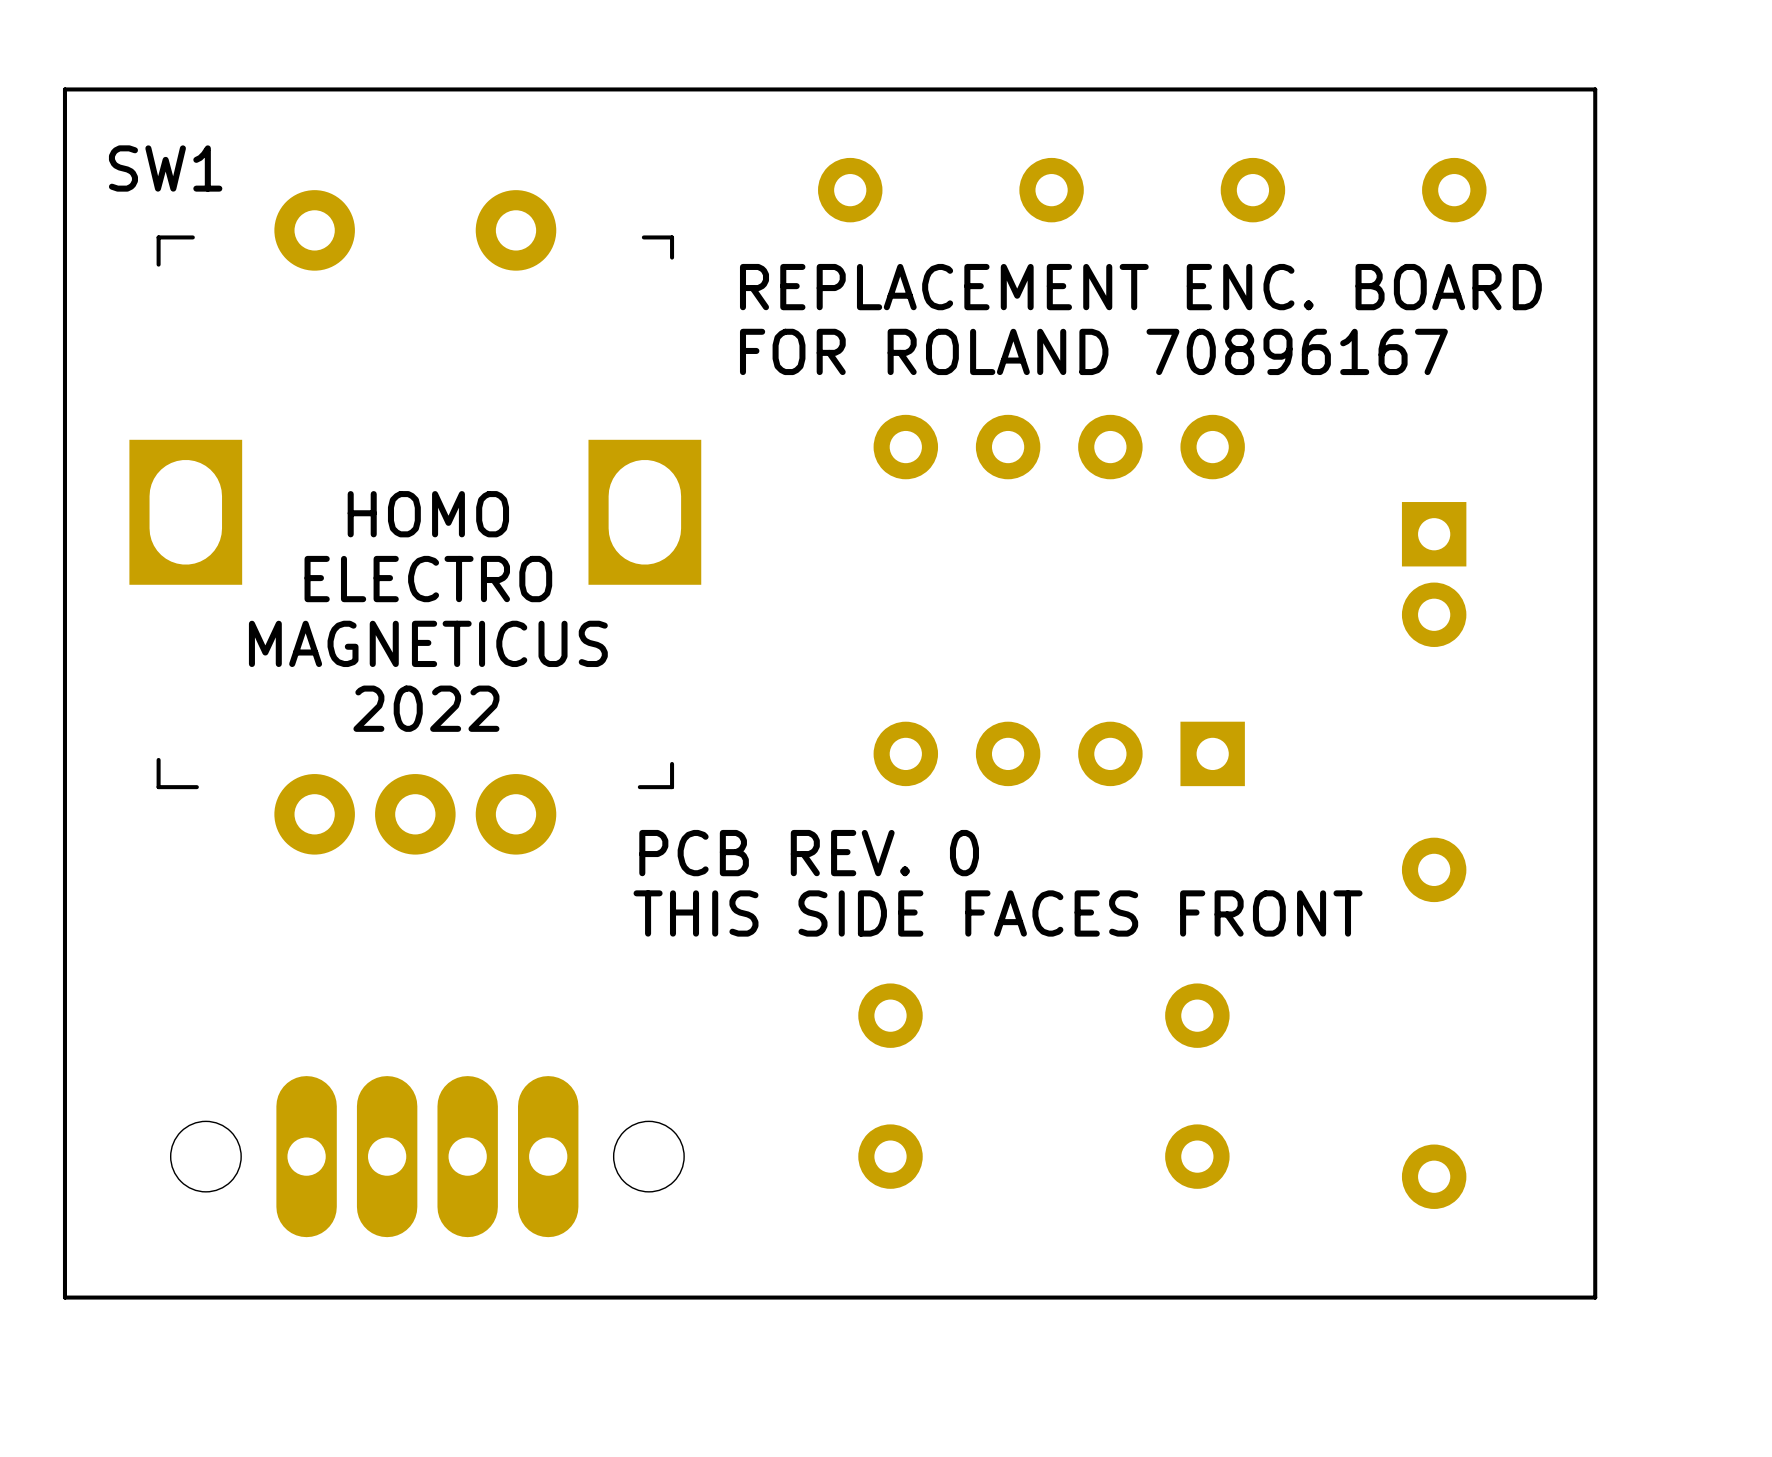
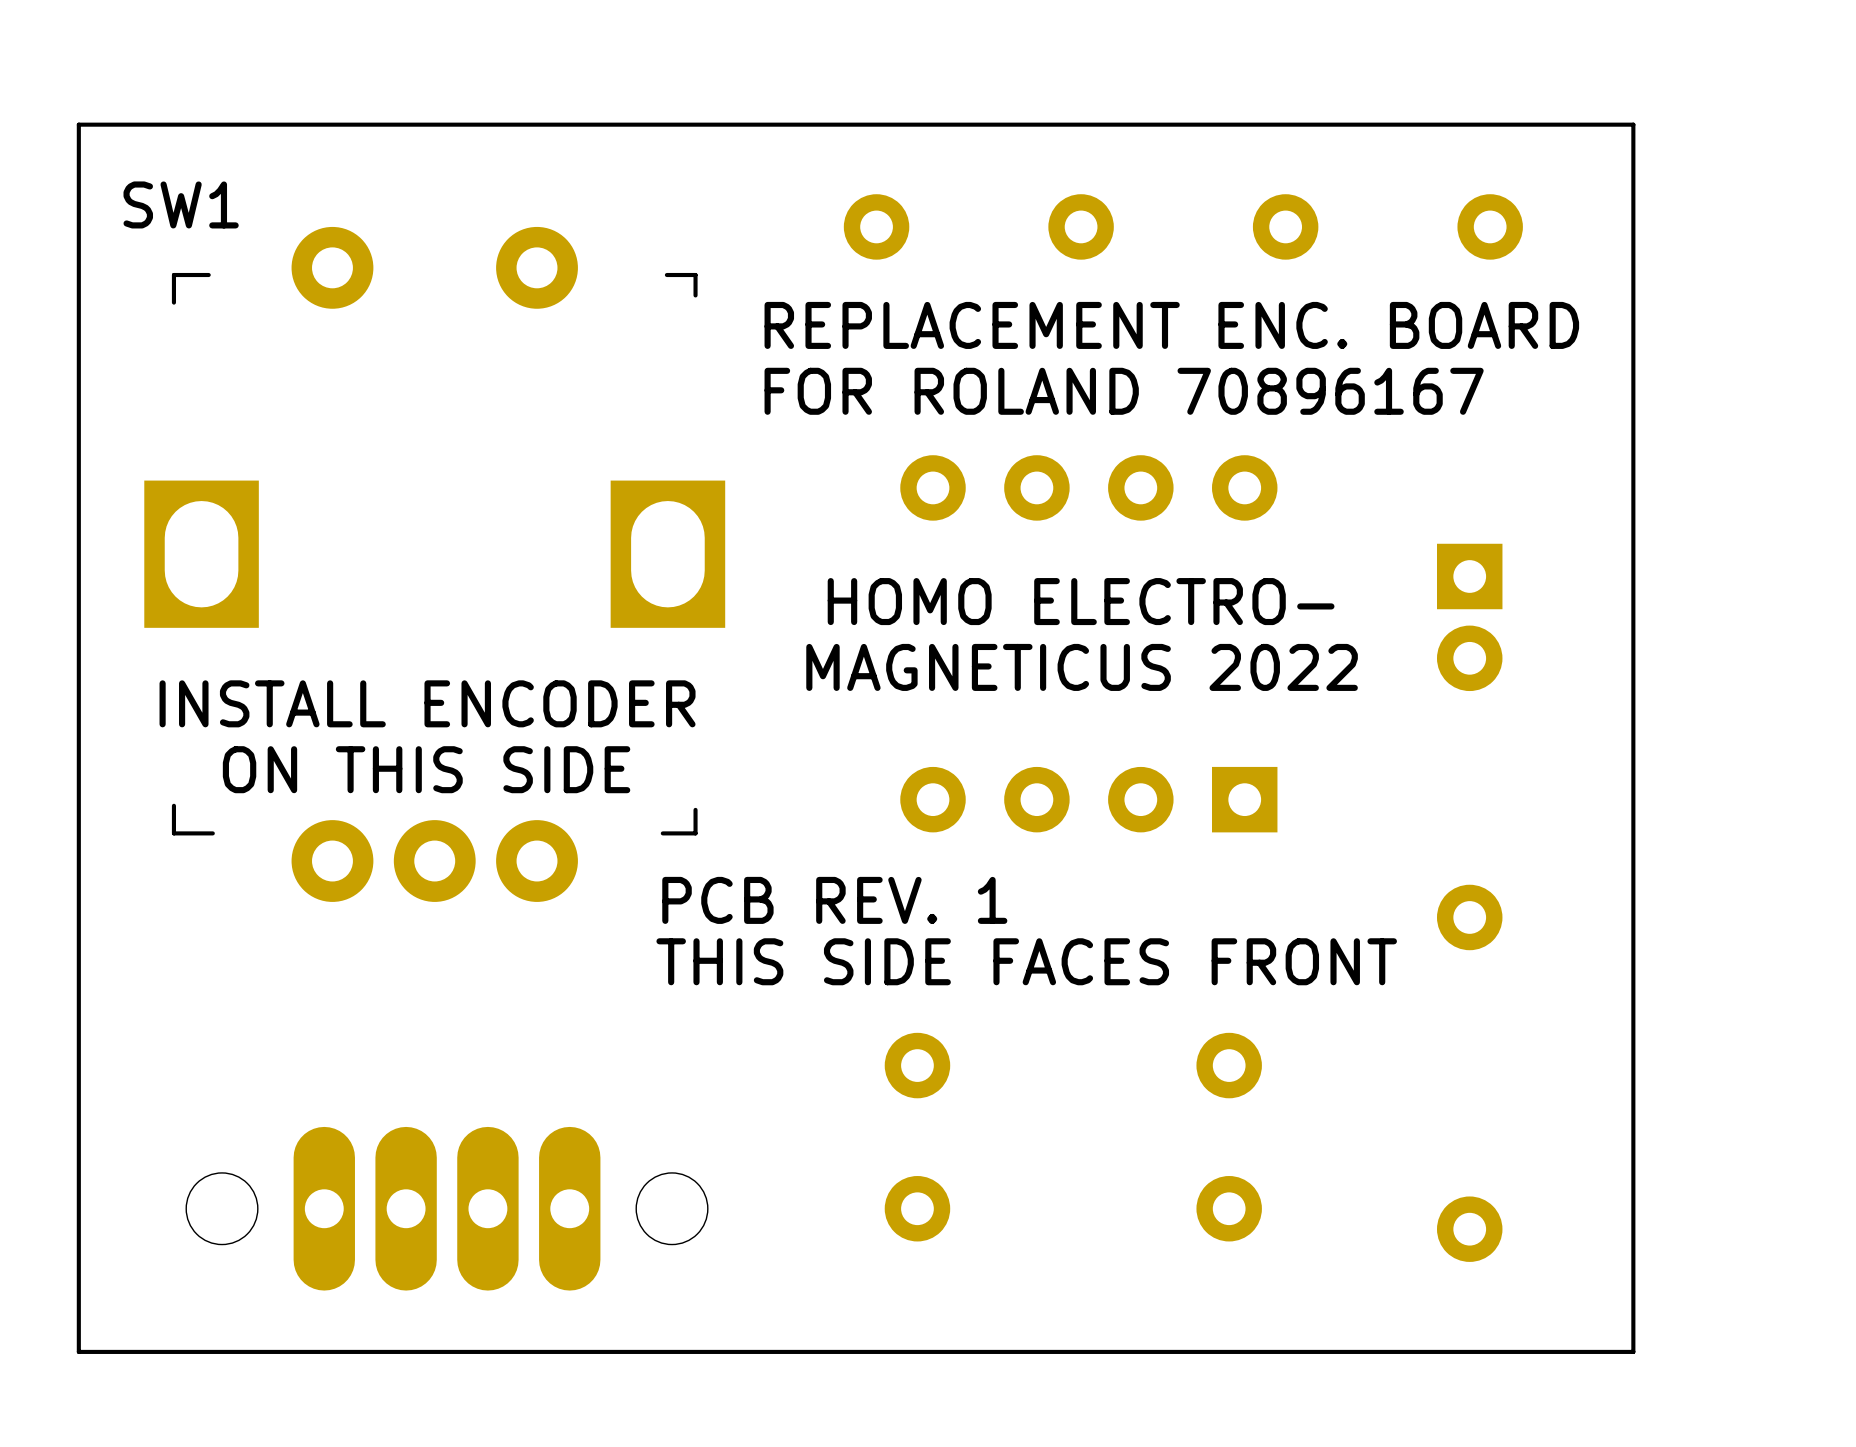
text: HOMO (428, 514) -> none
text: none -> HOMO ELECTRO- (1081, 601)
text: ELECTRO (428, 579) -> none
text: none -> MAGNETICUS 2022 (1082, 667)
text: MAGNETICUS (428, 643) -> INSTALL ENCODER (427, 703)
text: 2022 (426, 708) -> ON THIS SIDE (426, 769)
text: PCB REV. 0 (809, 853) -> PCB REV. 1 (834, 900)

